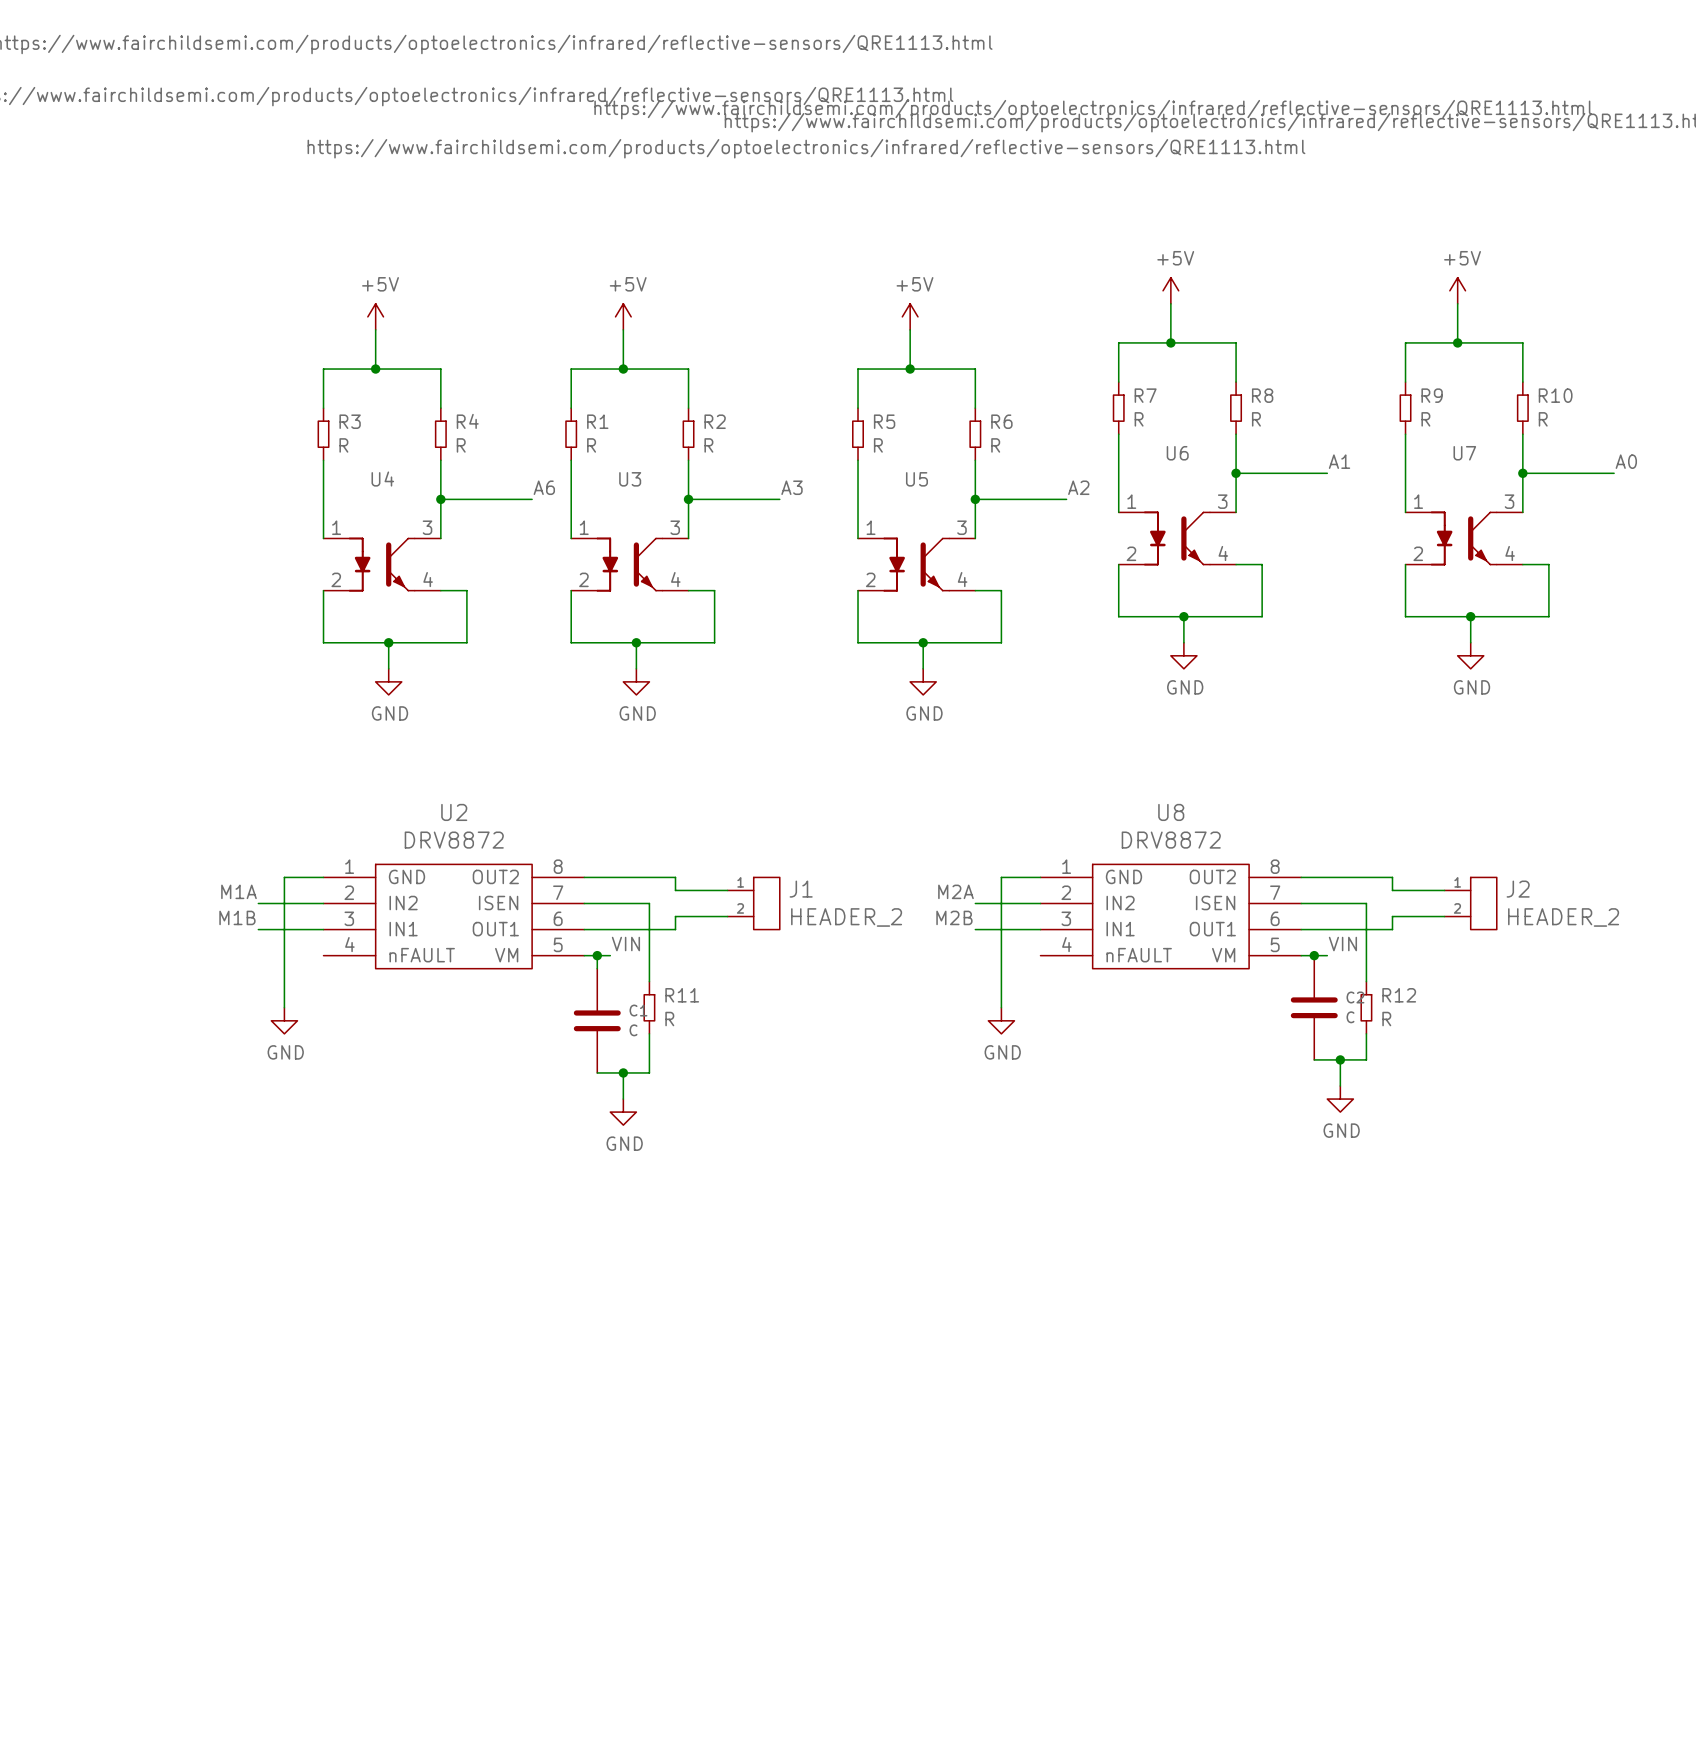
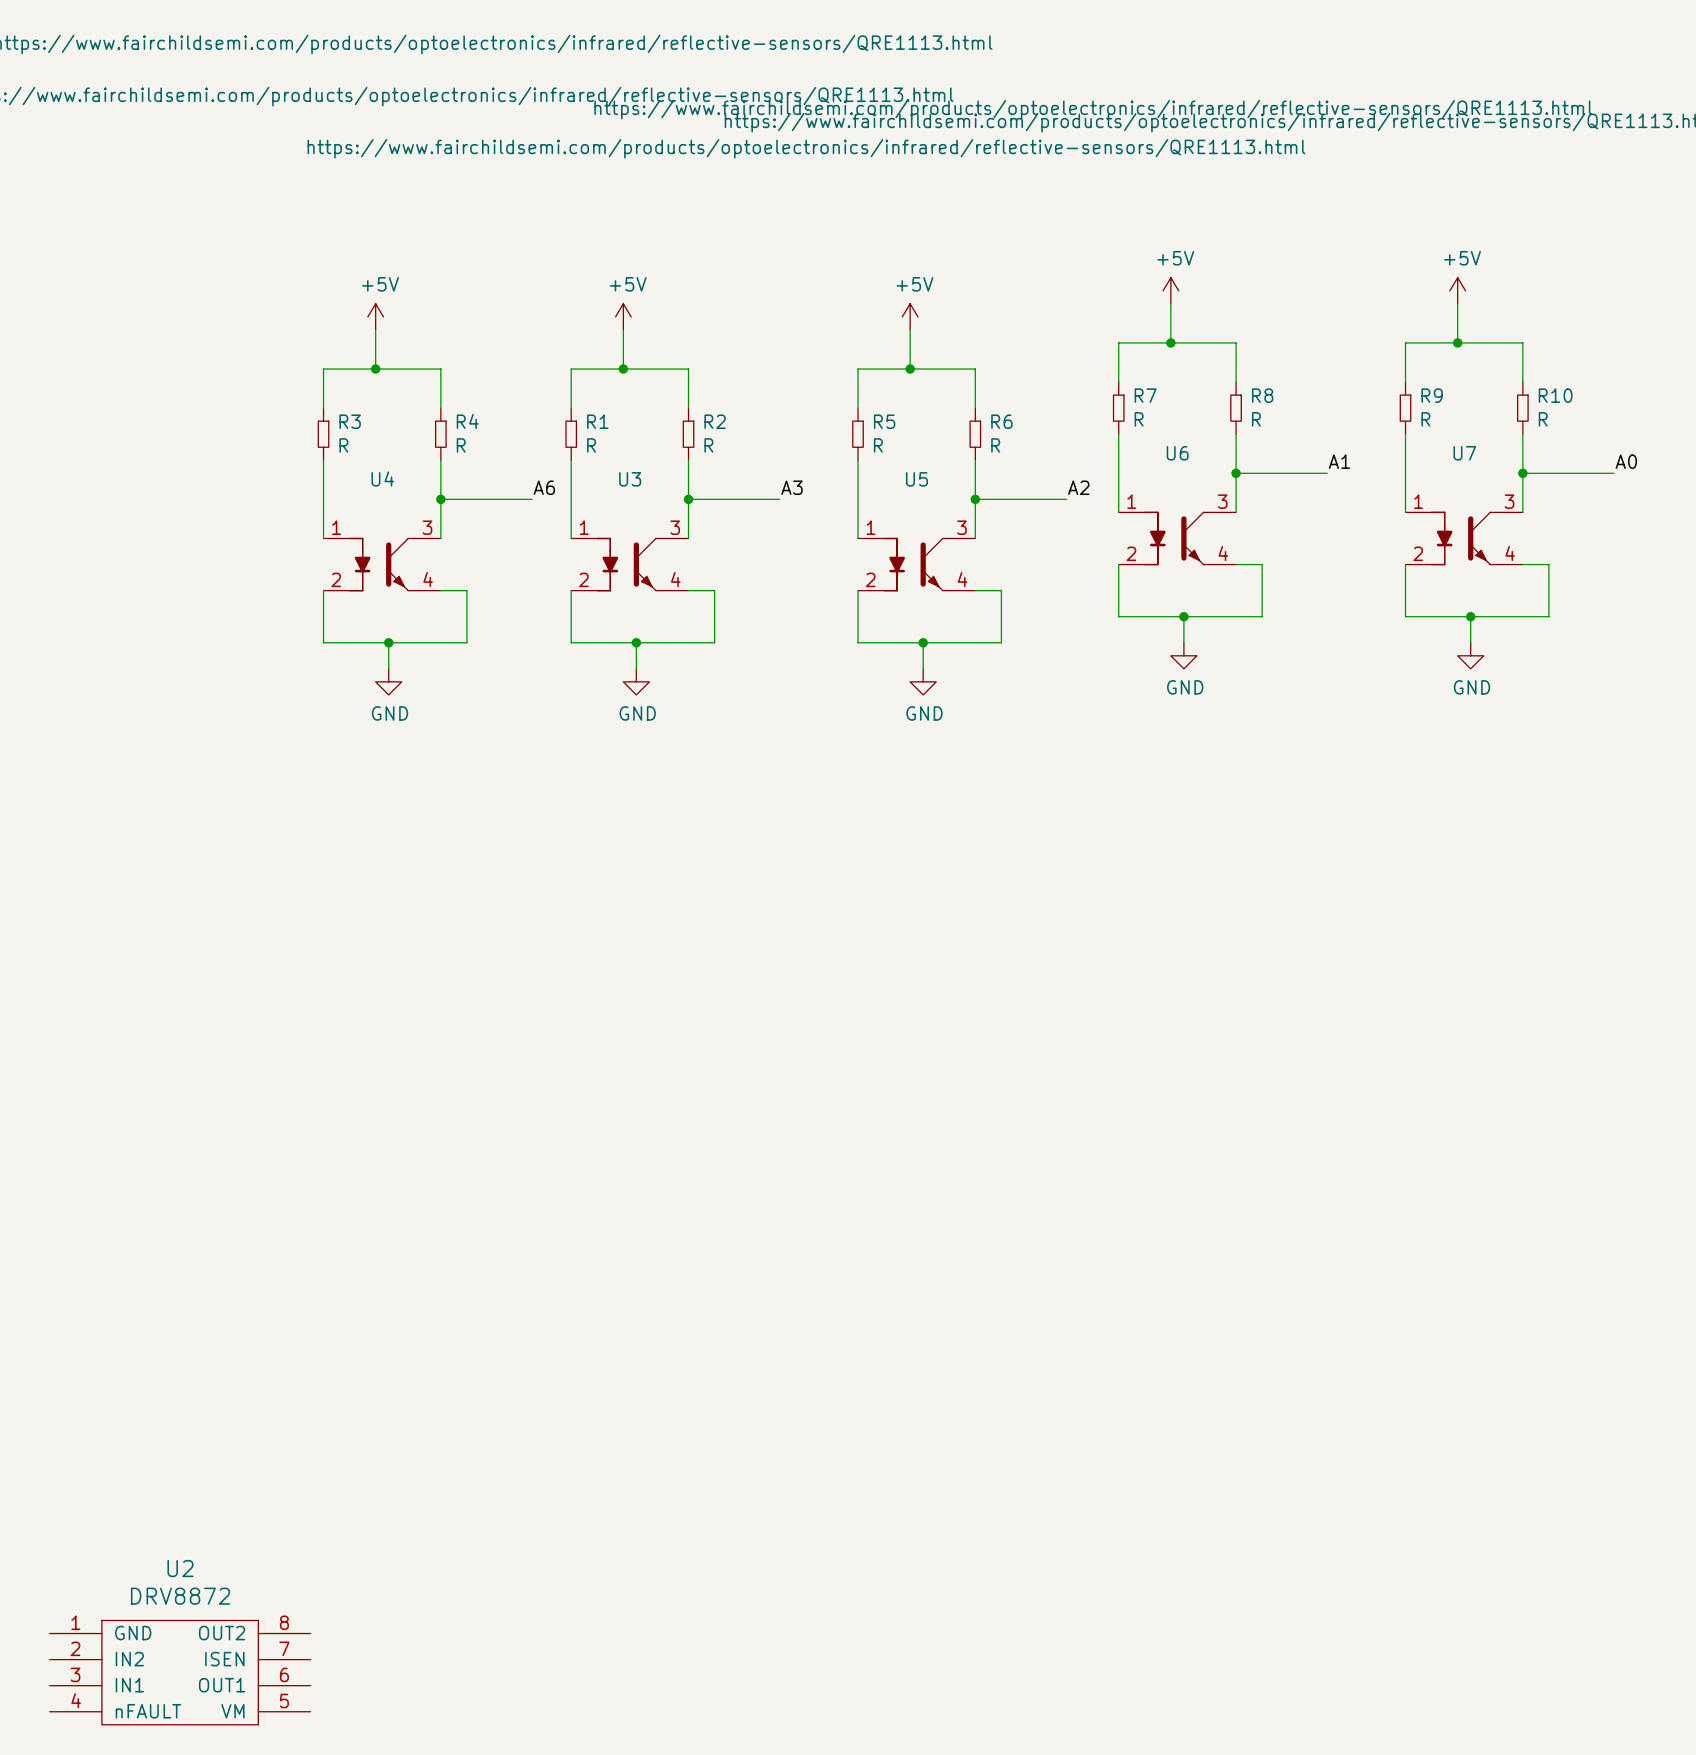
wire: (323, 877) (284, 877) (284, 1007) -> none
wire: (584, 877) (675, 877) (675, 890) (727, 890) -> none
wire: (1040, 877) (1001, 877) (1001, 1007) -> none
wire: (1301, 877) (1392, 877) (1392, 890) (1444, 890) -> none
label: M1A (239, 891) -> none
label: M2A (955, 891) -> none
wire: (258, 903) (323, 903) -> none
wire: (584, 903) (649, 903) (649, 981) -> none
J1: HEADER_2 (753, 903) -> none
wire: (975, 903) (1040, 903) -> none
wire: (1301, 903) (1366, 903) (1366, 981) -> none
J2: HEADER_2 (1470, 903) -> none
U2 position: (453, 916) -> (180, 1672)
wire: (727, 916) (675, 916) (675, 929) (584, 929) -> none
U8: DRV8872 (1170, 916) -> none
wire: (1444, 916) (1392, 916) (1392, 929) (1301, 929) -> none
label: M1B (237, 917) -> none
label: M2B (954, 917) -> none
wire: (258, 929) (323, 929) -> none
wire: (975, 929) (1040, 929) -> none
label: VIN (625, 944) -> none
label: VIN (1342, 944) -> none
wire: (584, 955) (610, 955) -> none
wire: (597, 955) (597, 968) -> none
junction: (597, 955) -> none
wire: (1301, 955) (1327, 955) -> none
junction: (1314, 955) -> none
R11: R (649, 1007) -> none
C2: C (1314, 1007) -> none
R12: R (1366, 1007) -> none
power symbol: GND (284, 1020) -> none
C1: C (597, 1020) -> none
power symbol: GND (1001, 1020) -> none
wire: (649, 1033) (649, 1072) (597, 1072) -> none
wire: (1366, 1033) (1366, 1059) (1314, 1059) -> none
wire: (1340, 1059) (1340, 1086) -> none
junction: (1340, 1059) -> none
wire: (623, 1072) (623, 1099) -> none
junction: (623, 1072) -> none
power symbol: GND (1340, 1099) -> none
power symbol: GND (623, 1112) -> none

